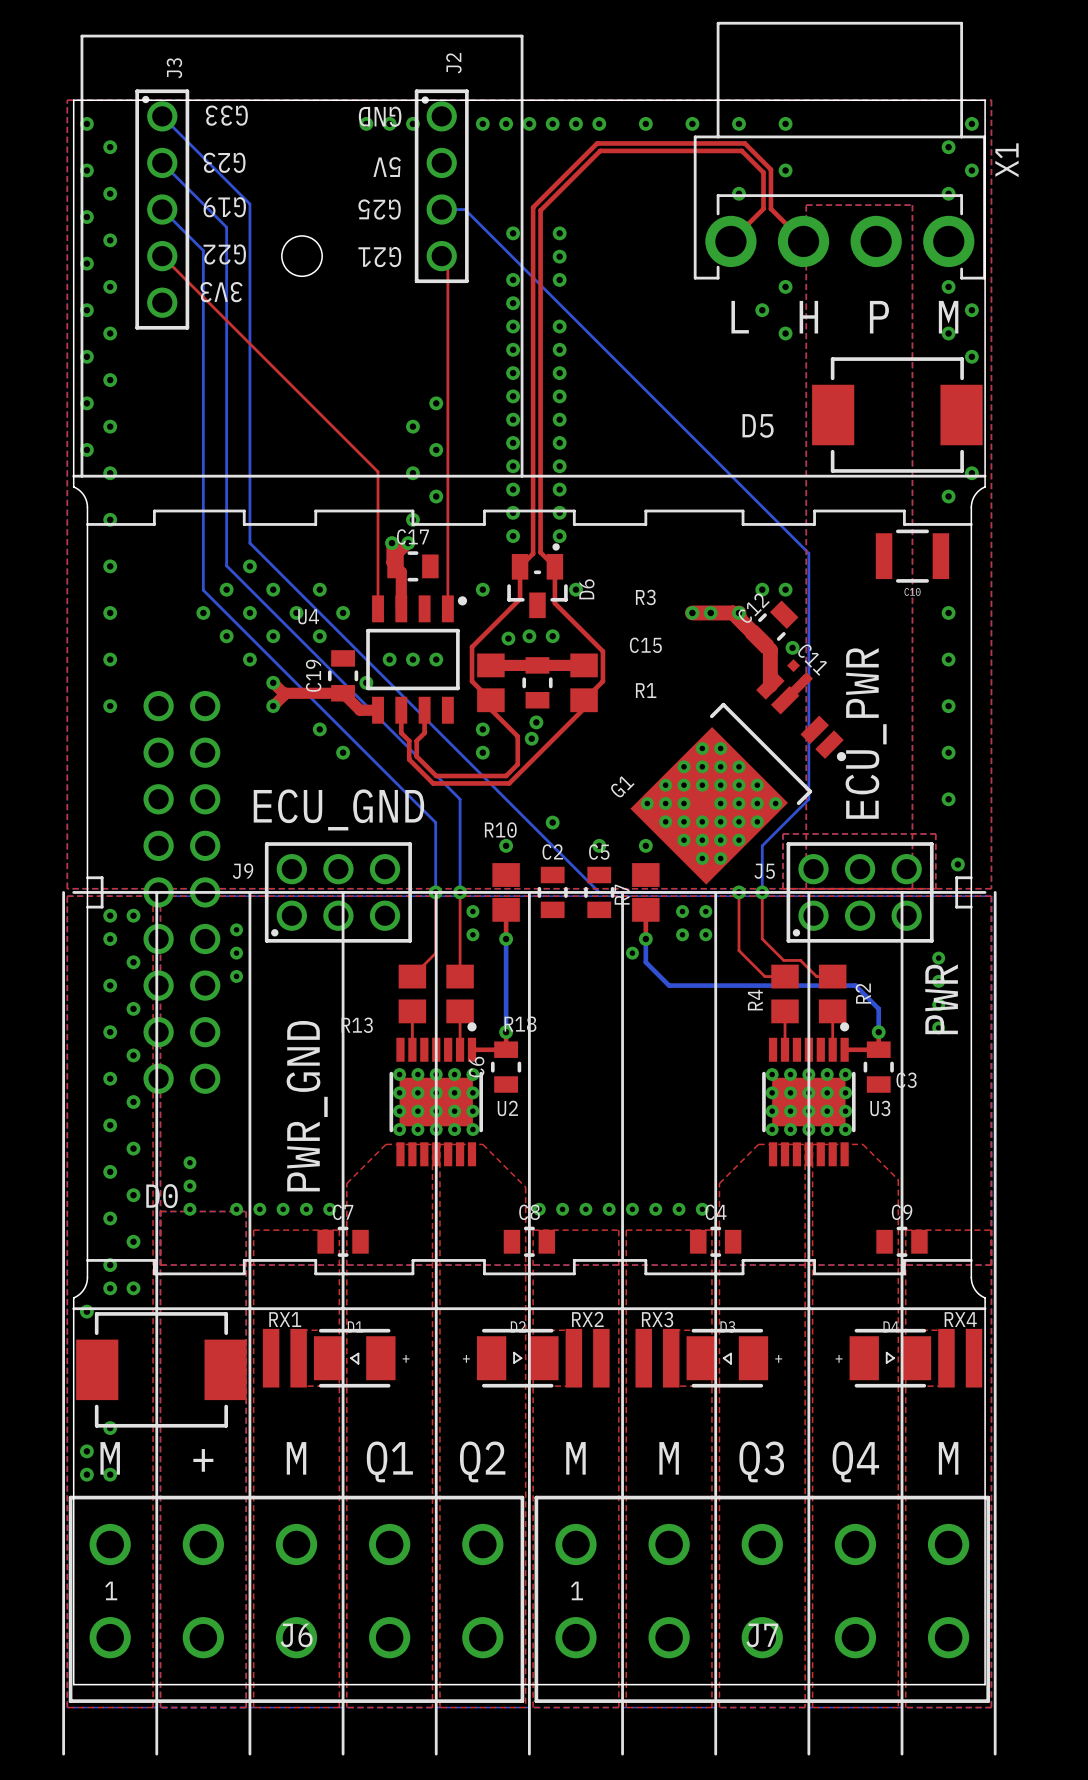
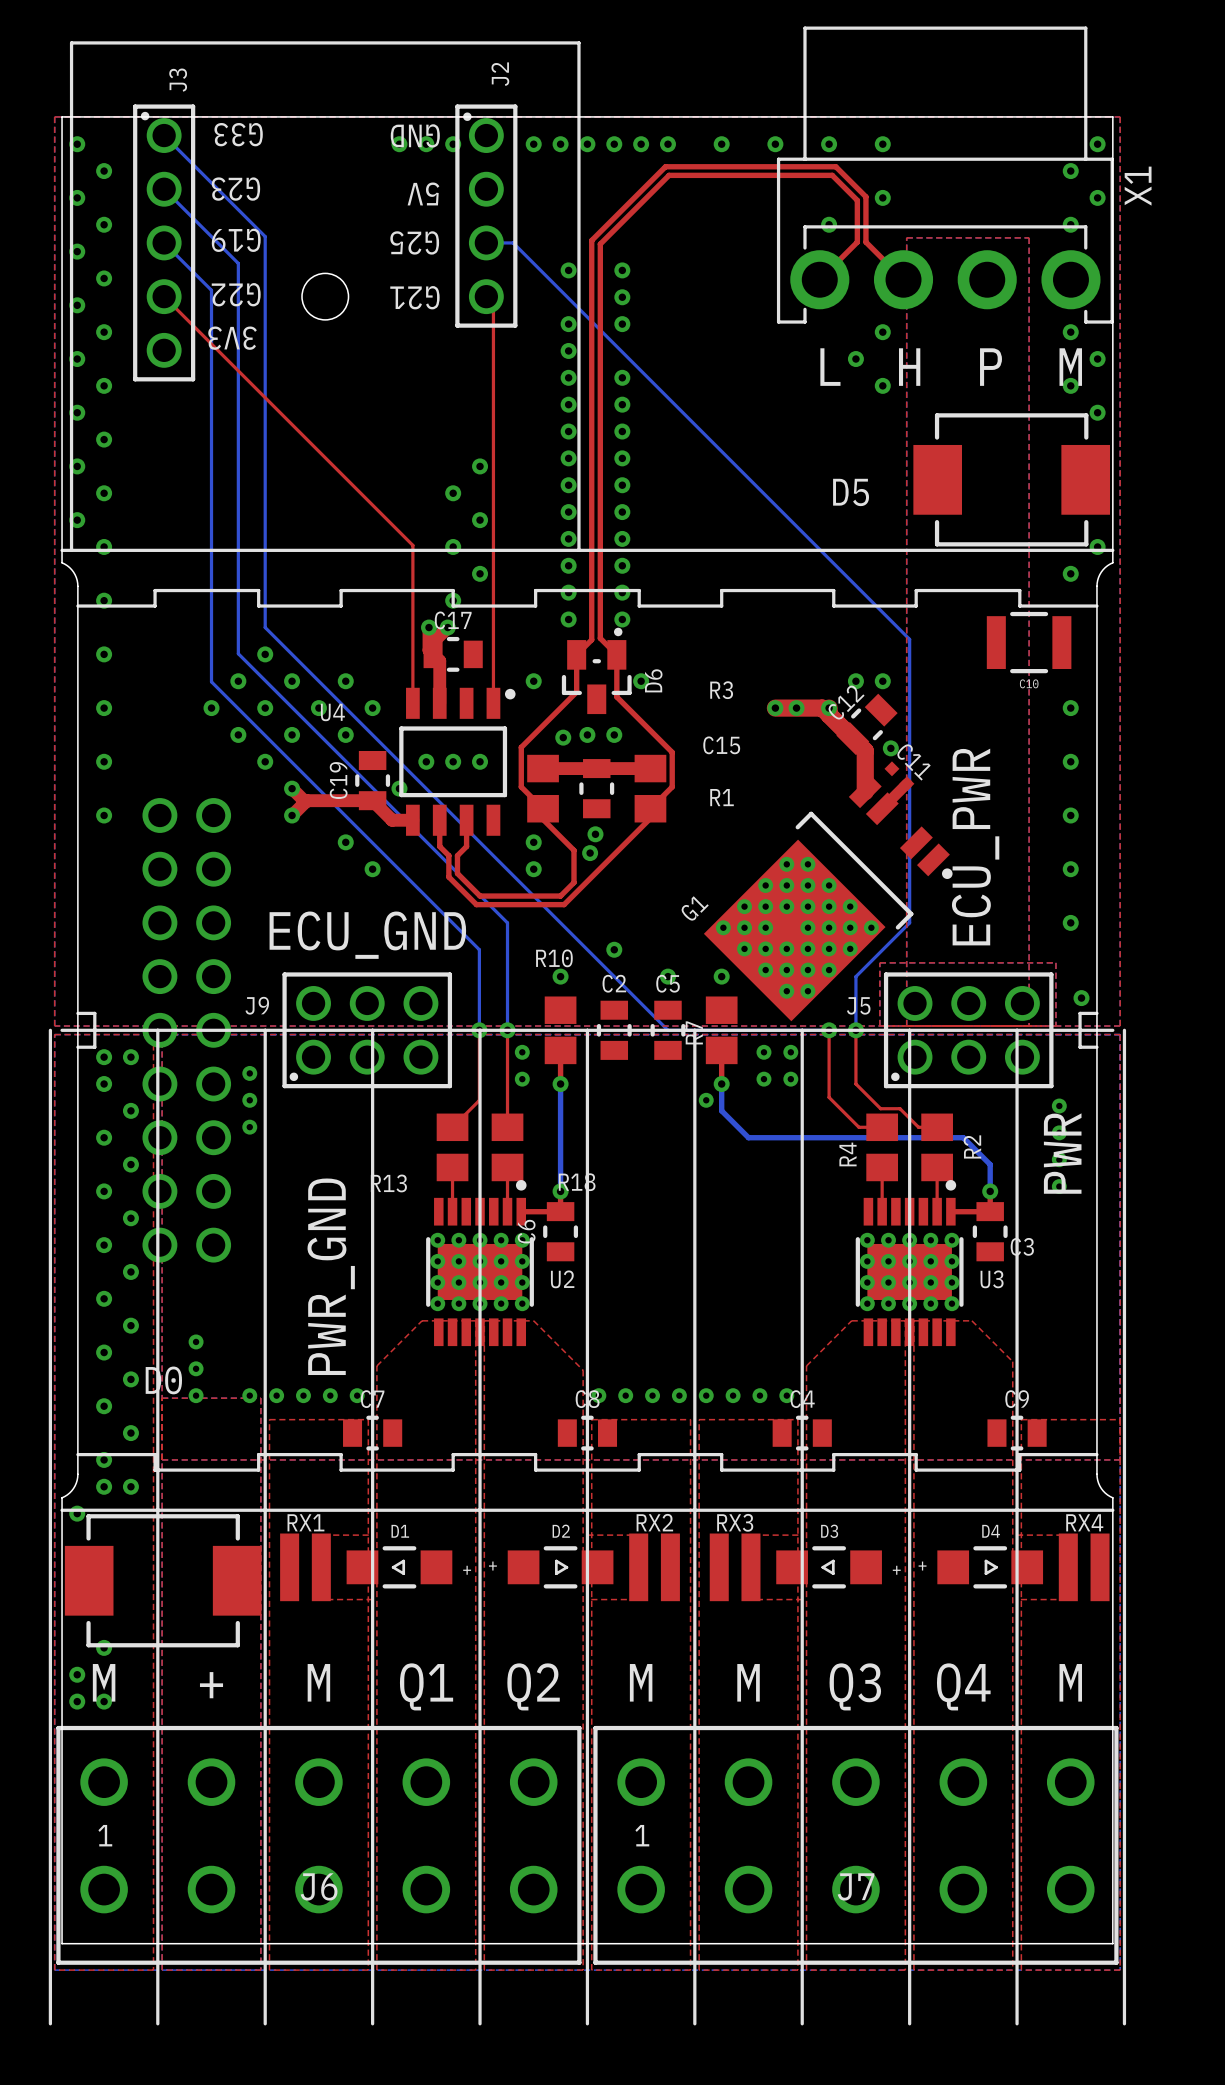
D1 footprint: [313, 1328, 396, 1388] -> [346, 1546, 453, 1589]
D2 footprint: [476, 1328, 559, 1388] -> [507, 1546, 614, 1589]
D3 footprint: [686, 1328, 769, 1388] -> [776, 1546, 882, 1589]
D4 footprint: [849, 1328, 932, 1388] -> [937, 1546, 1044, 1589]

